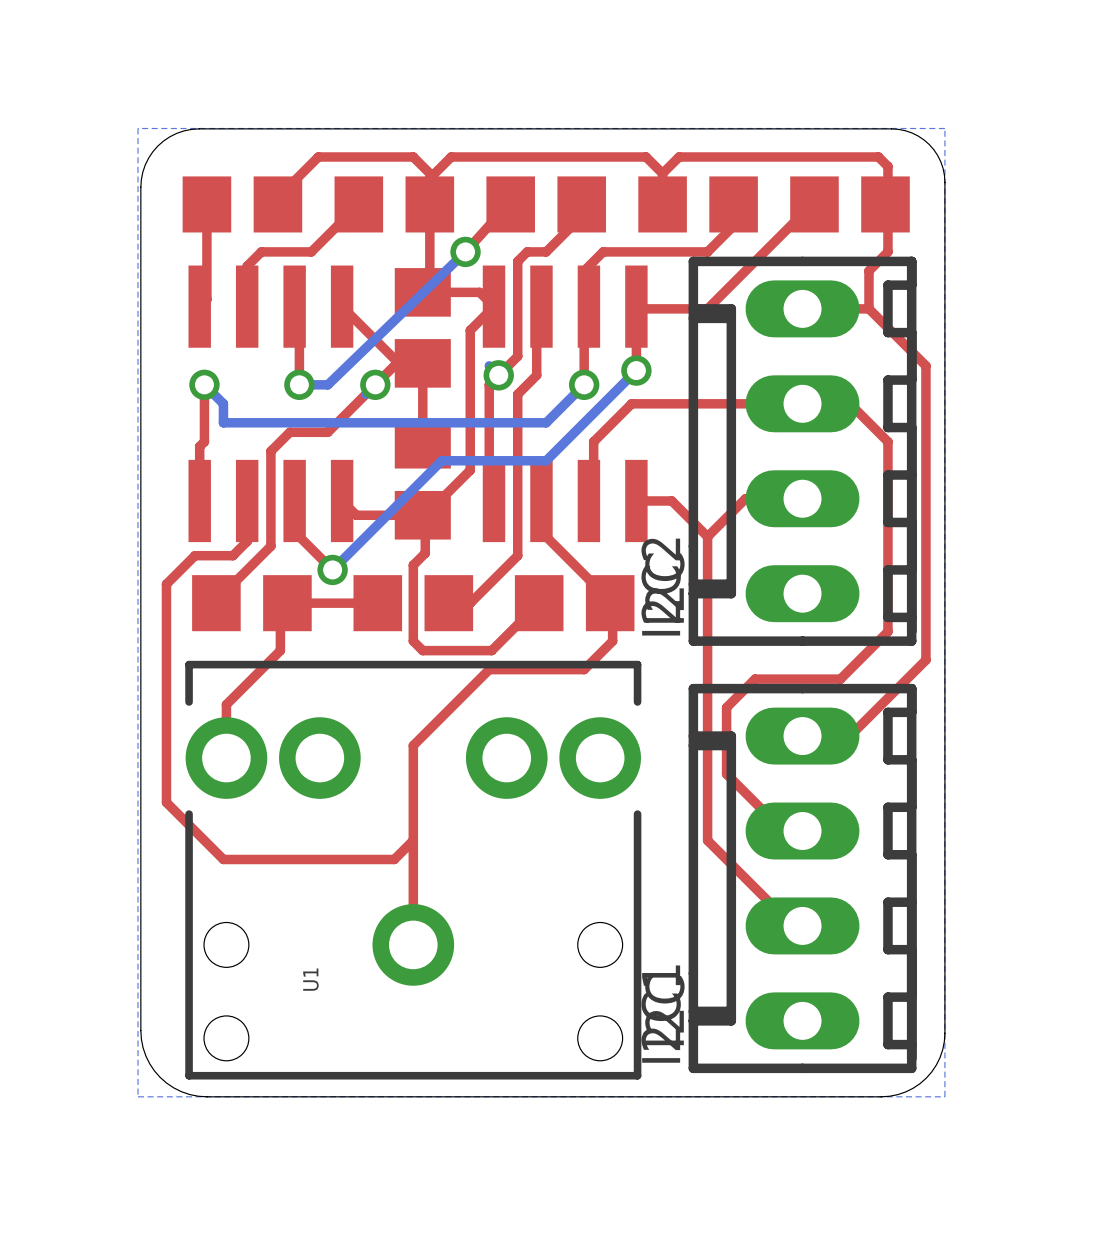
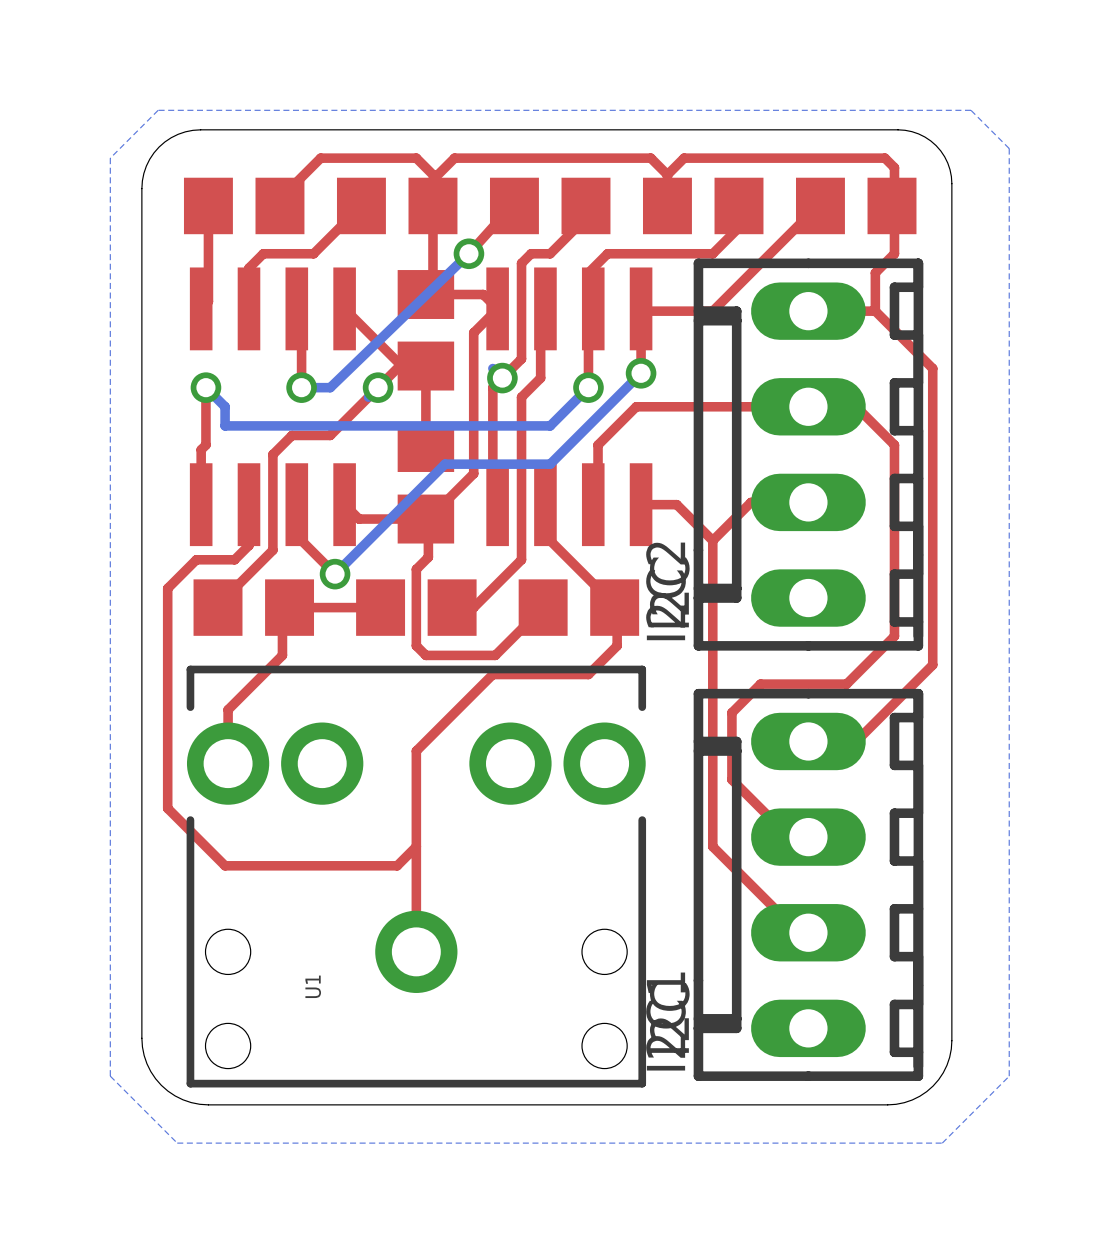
bottom zone outline: (944, 128) (944, 1096) (138, 1096) (138, 128) (944, 128) -> (970, 110) (1009, 148) (1009, 1076) (942, 1143) (177, 1143) (110, 1076) (110, 158) (158, 110) (970, 110)

